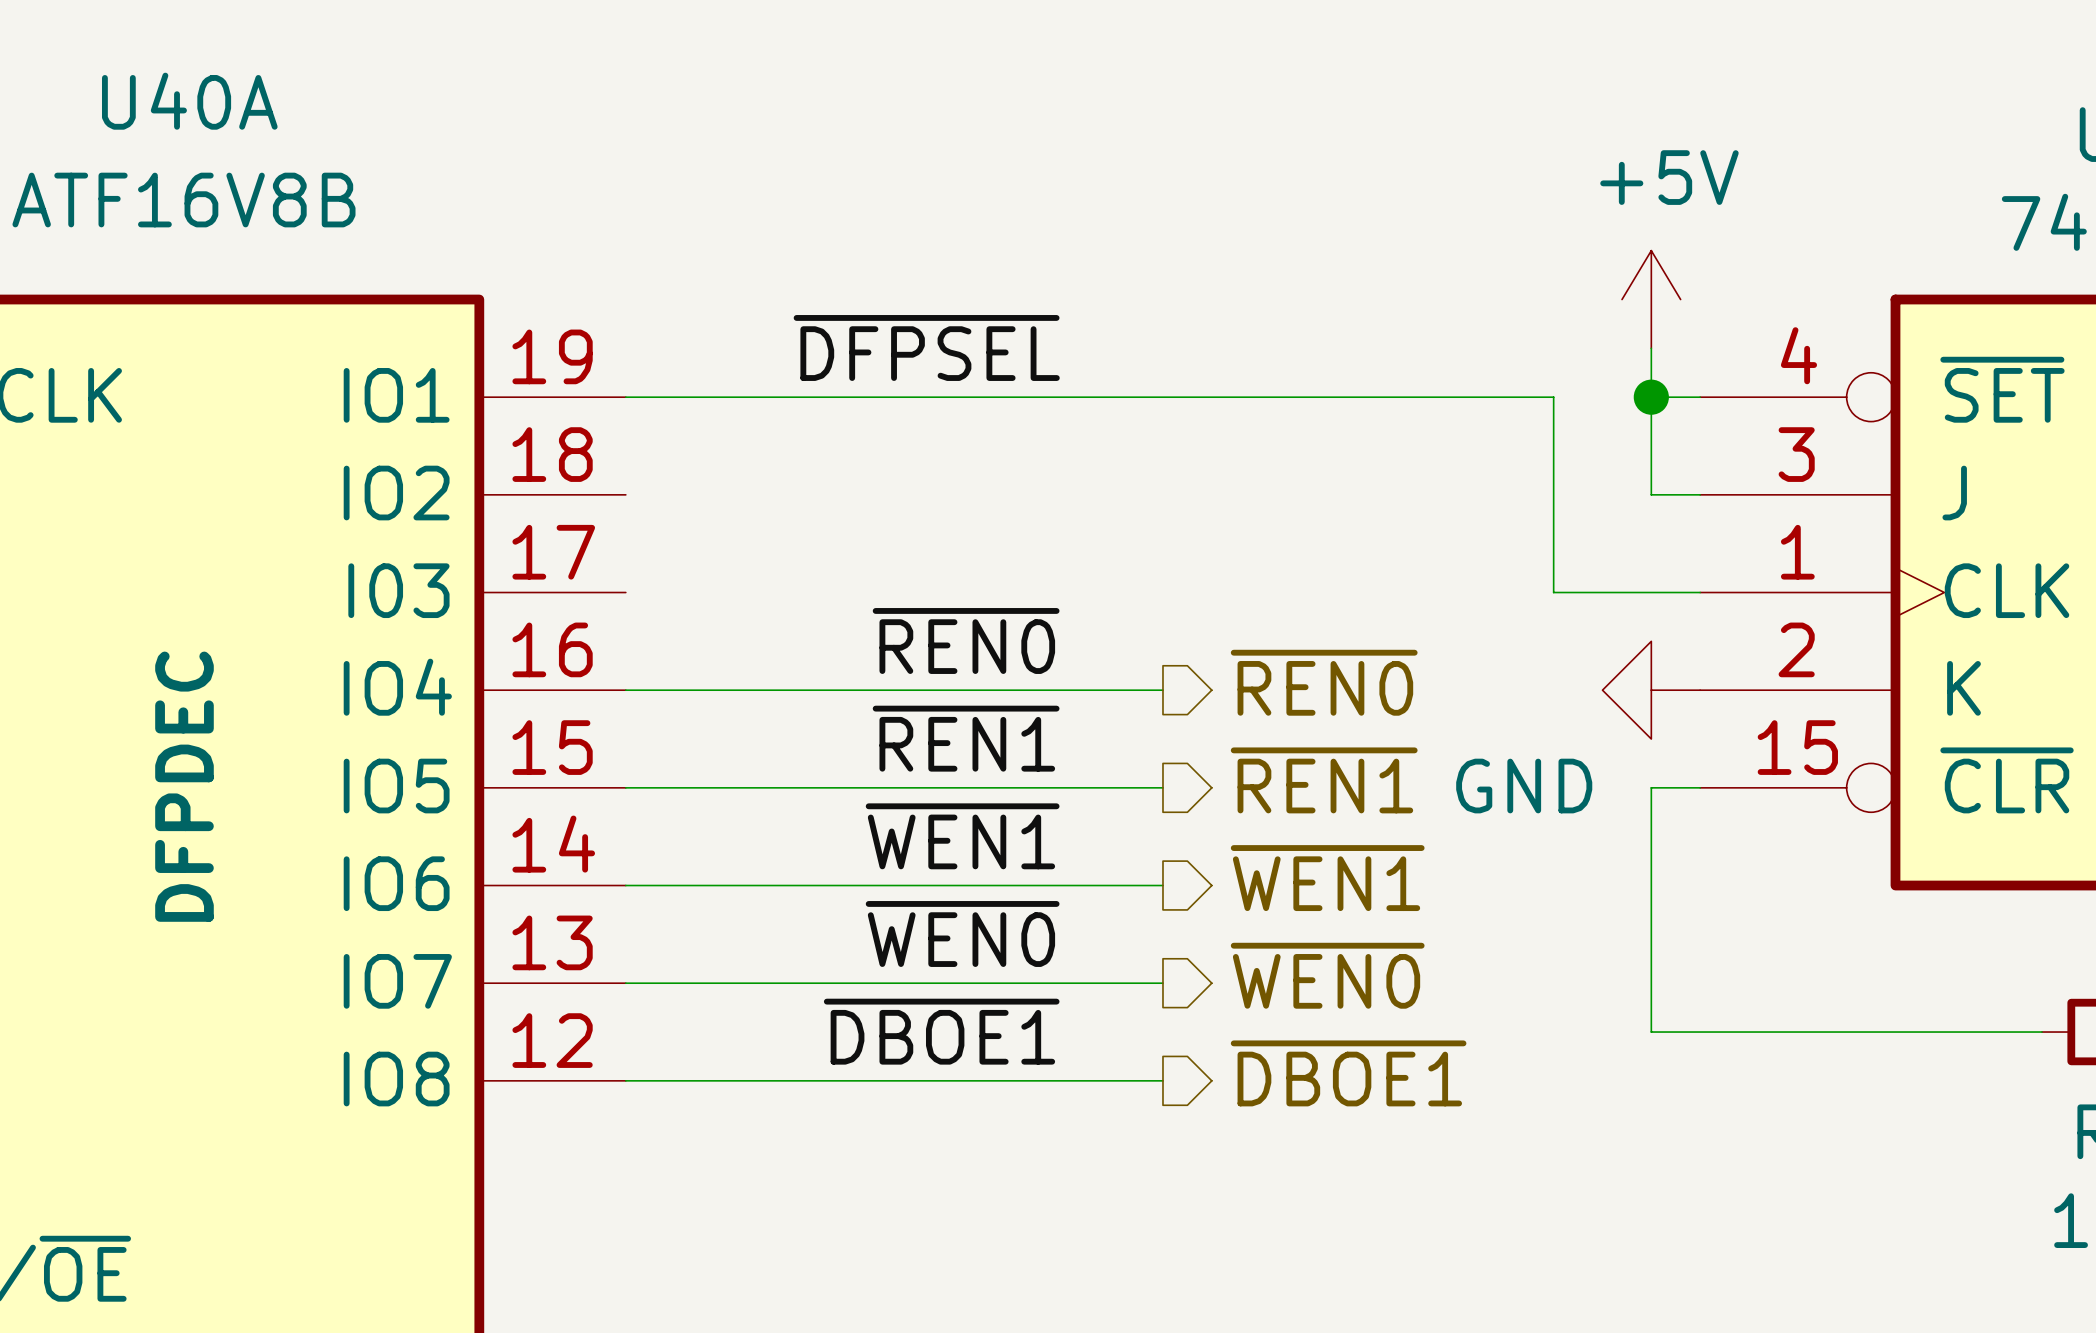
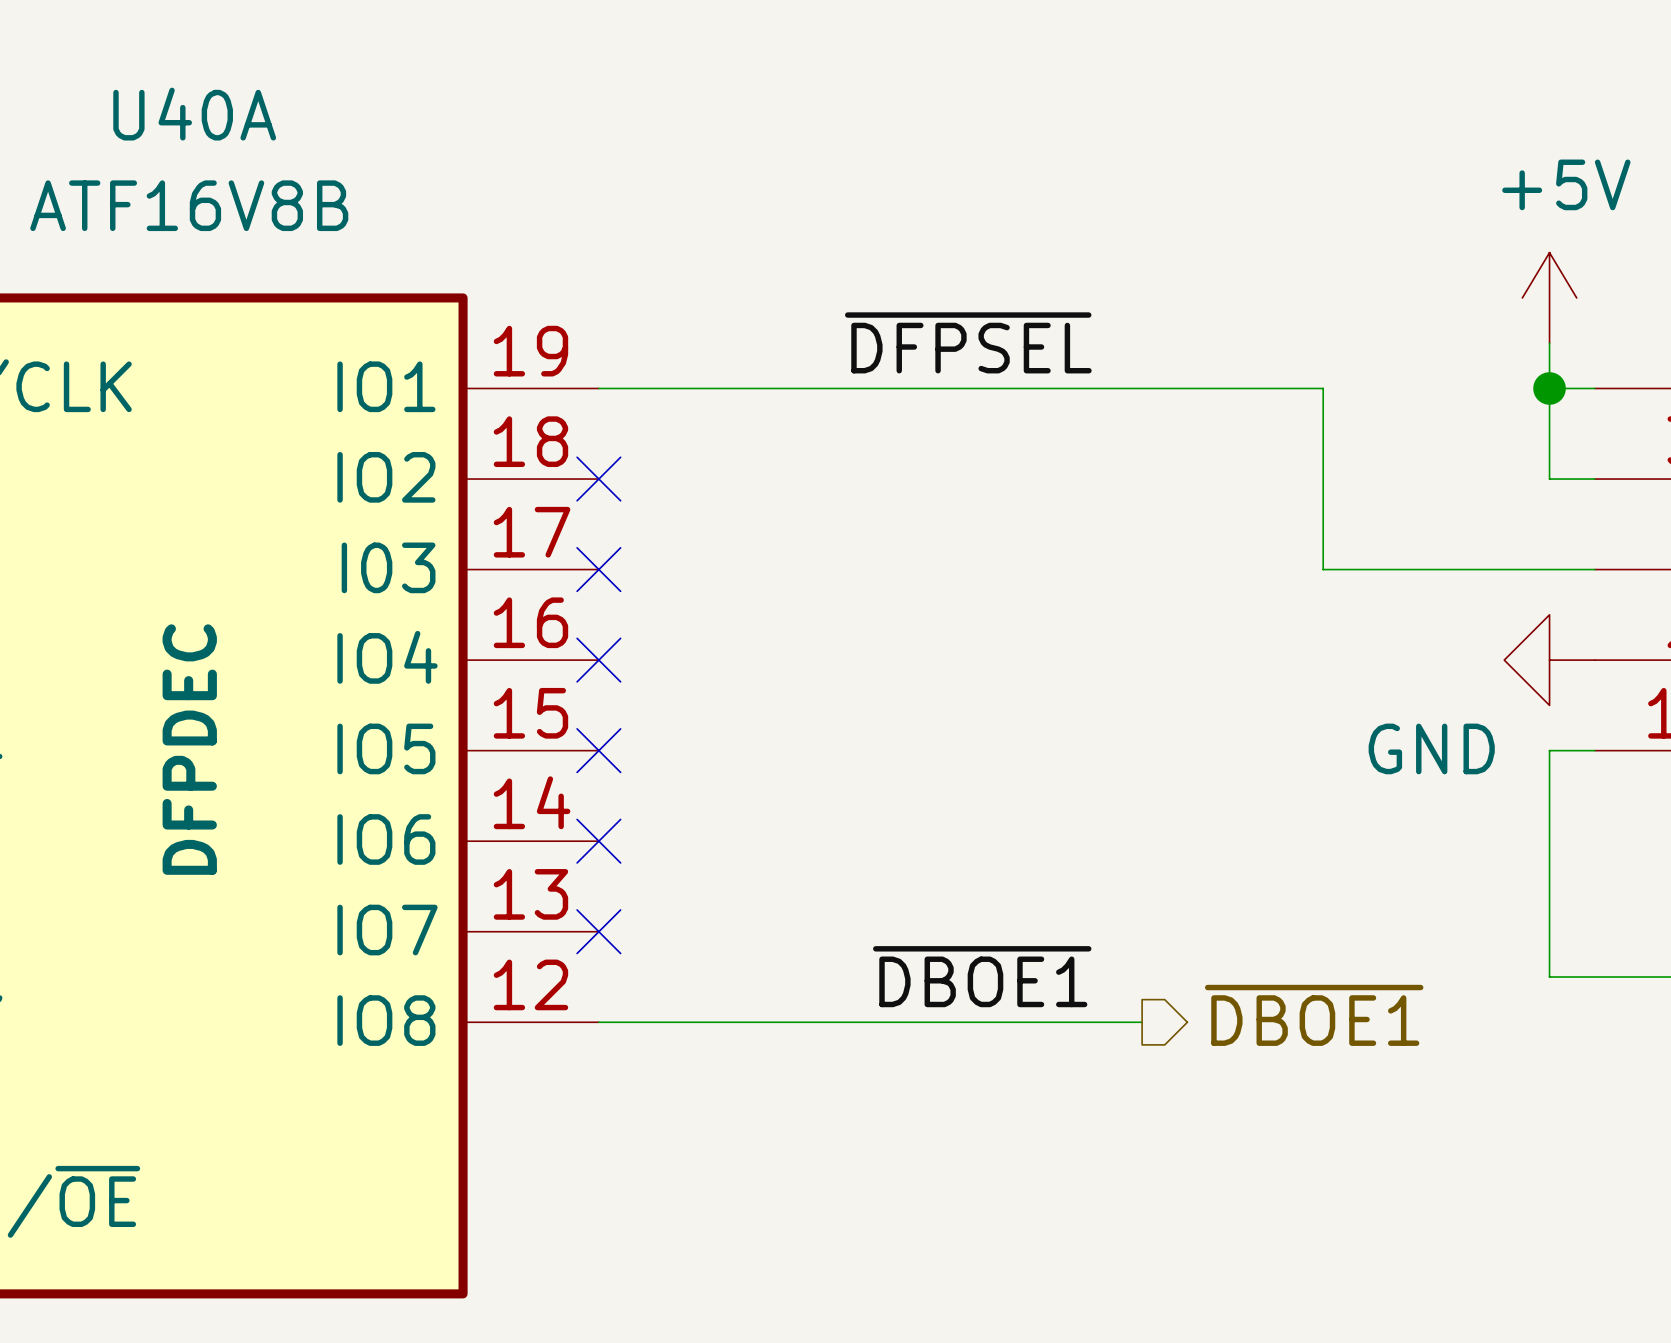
label position: ~{DFPSEL} (926, 347) -> ~{DFPSEL} (968, 342)
wire: (1407, 397) (1553, 397) (1553, 592) -> (1323, 388) (1323, 569) (1459, 569)
no-connect mark: none -> (598, 479)
no-connect mark: none -> (598, 569)
label: ~{REN0} (966, 640) -> none
hierarchical label: ~{REN0} (1324, 682) -> none
wire: (625, 690) (1162, 690) -> none
no-connect mark: none -> (598, 660)
label: ~{REN1} (966, 738) -> none
hierarchical label: ~{REN1} (1324, 780) -> none
wire: (625, 787) (1162, 787) -> none
no-connect mark: none -> (598, 750)
label: ~{WEN1} (962, 836) -> none
hierarchical label: ~{WEN1} (1327, 878) -> none
wire: (625, 885) (1162, 885) -> none
no-connect mark: none -> (598, 841)
label: ~{WEN0} (962, 933) -> none
hierarchical label: ~{WEN0} (1327, 975) -> none
wire: (625, 983) (1162, 983) -> none
no-connect mark: none -> (598, 931)
label position: ~{DBOE1} (941, 1031) -> ~{DBOE1} (982, 976)
hierarchical label position: ~{DBOE1} (1348, 1073) -> ~{DBOE1} (1314, 1015)
wire: none -> (1096, 1022) (1142, 1022)

